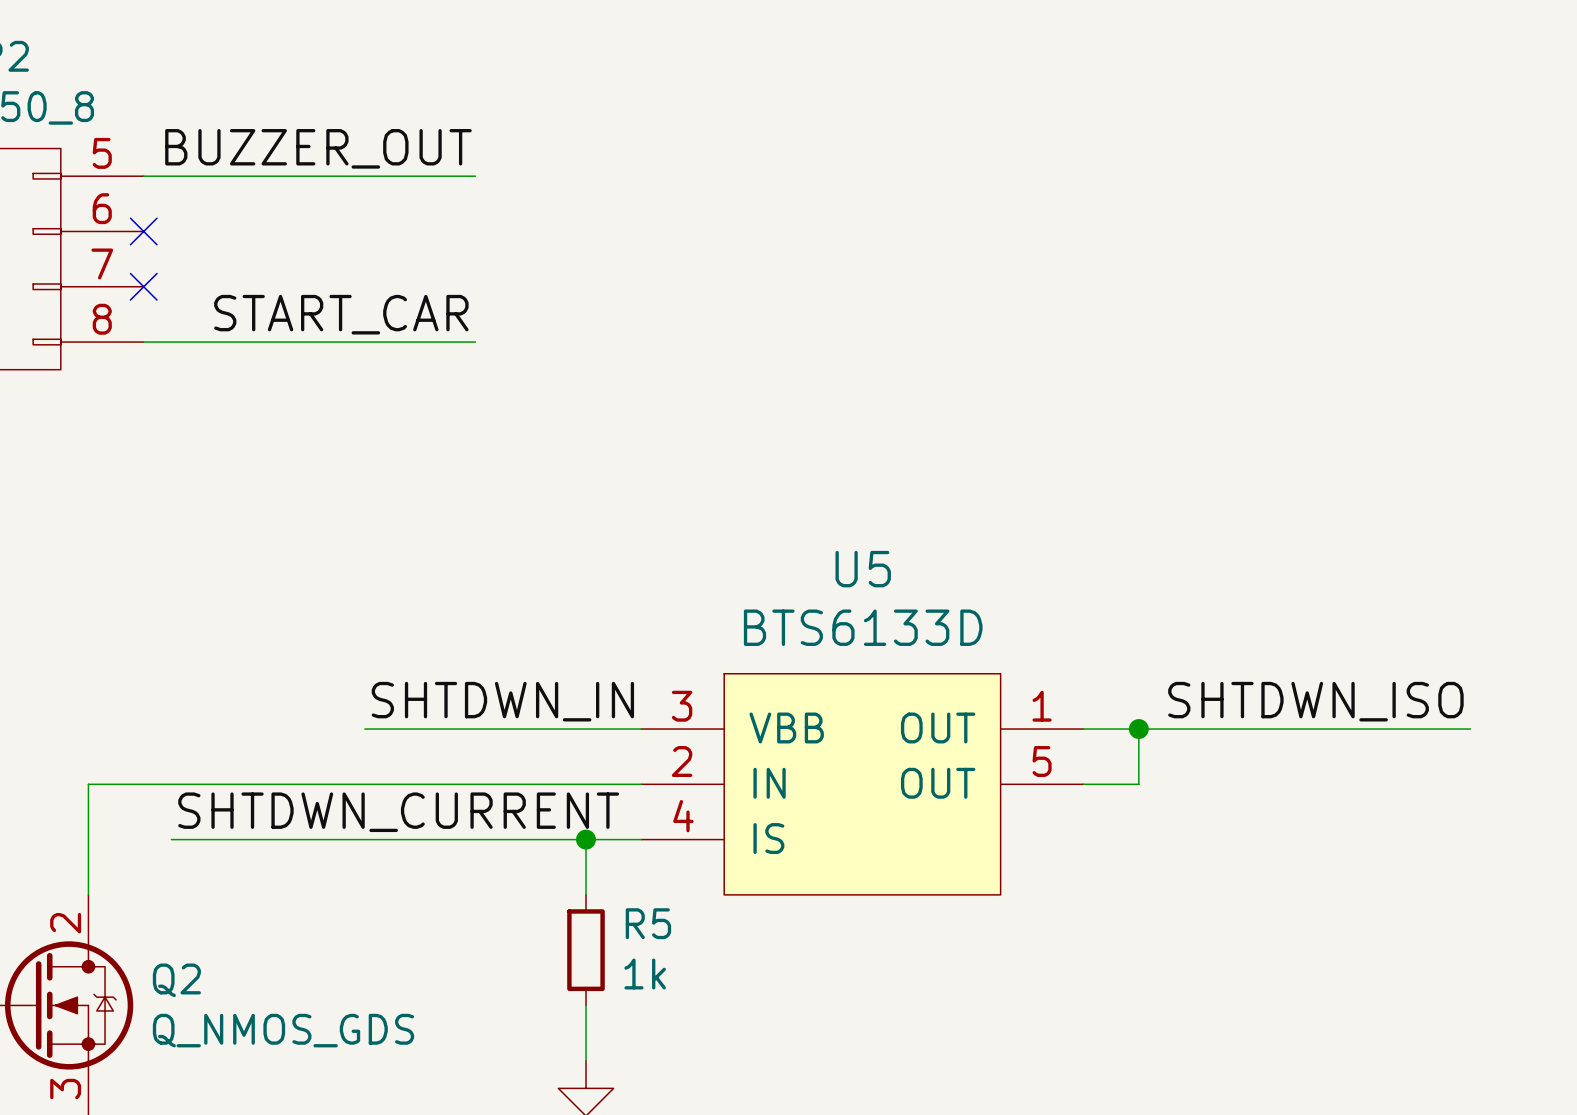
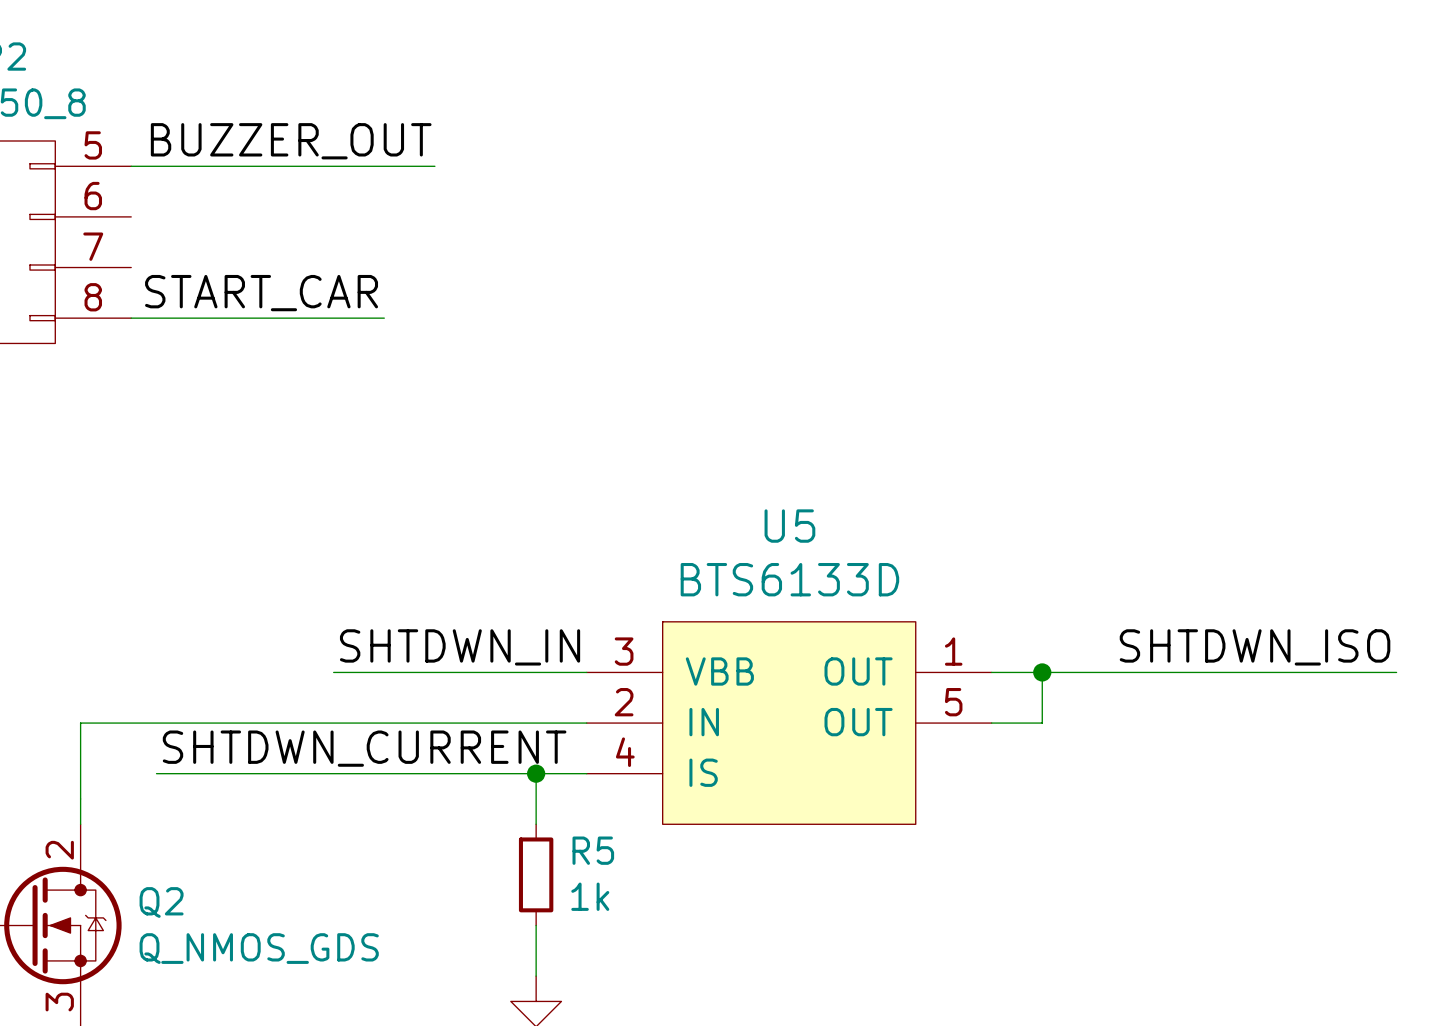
no-connect mark: (143, 231) -> none
no-connect mark: (143, 286) -> none
label position: START_CAR (341, 314) -> START_CAR (261, 293)
wire: (420, 342) (475, 342) -> none
label position: SHTDWN_ISO (1315, 701) -> SHTDWN_ISO (1255, 647)
wire: none -> (1345, 672) (1396, 672)

